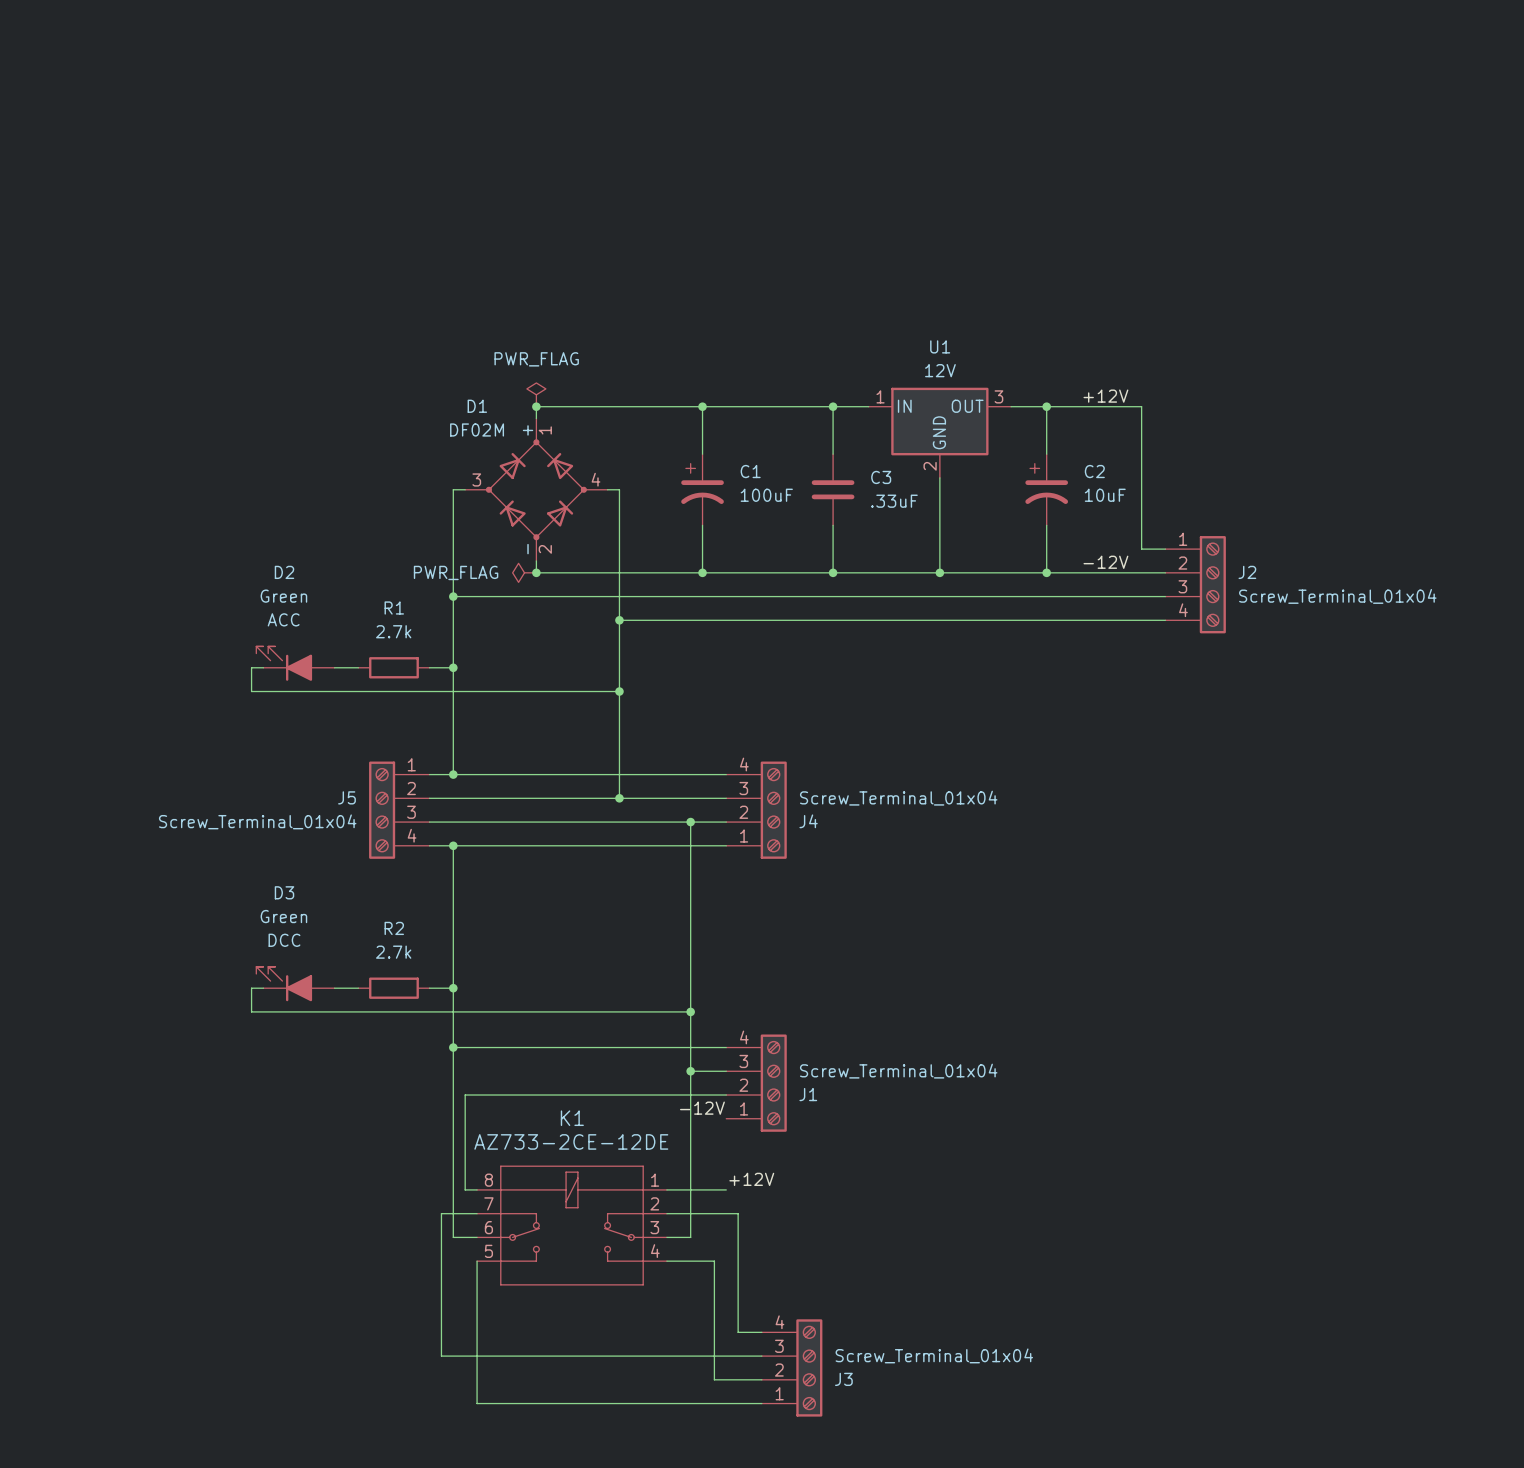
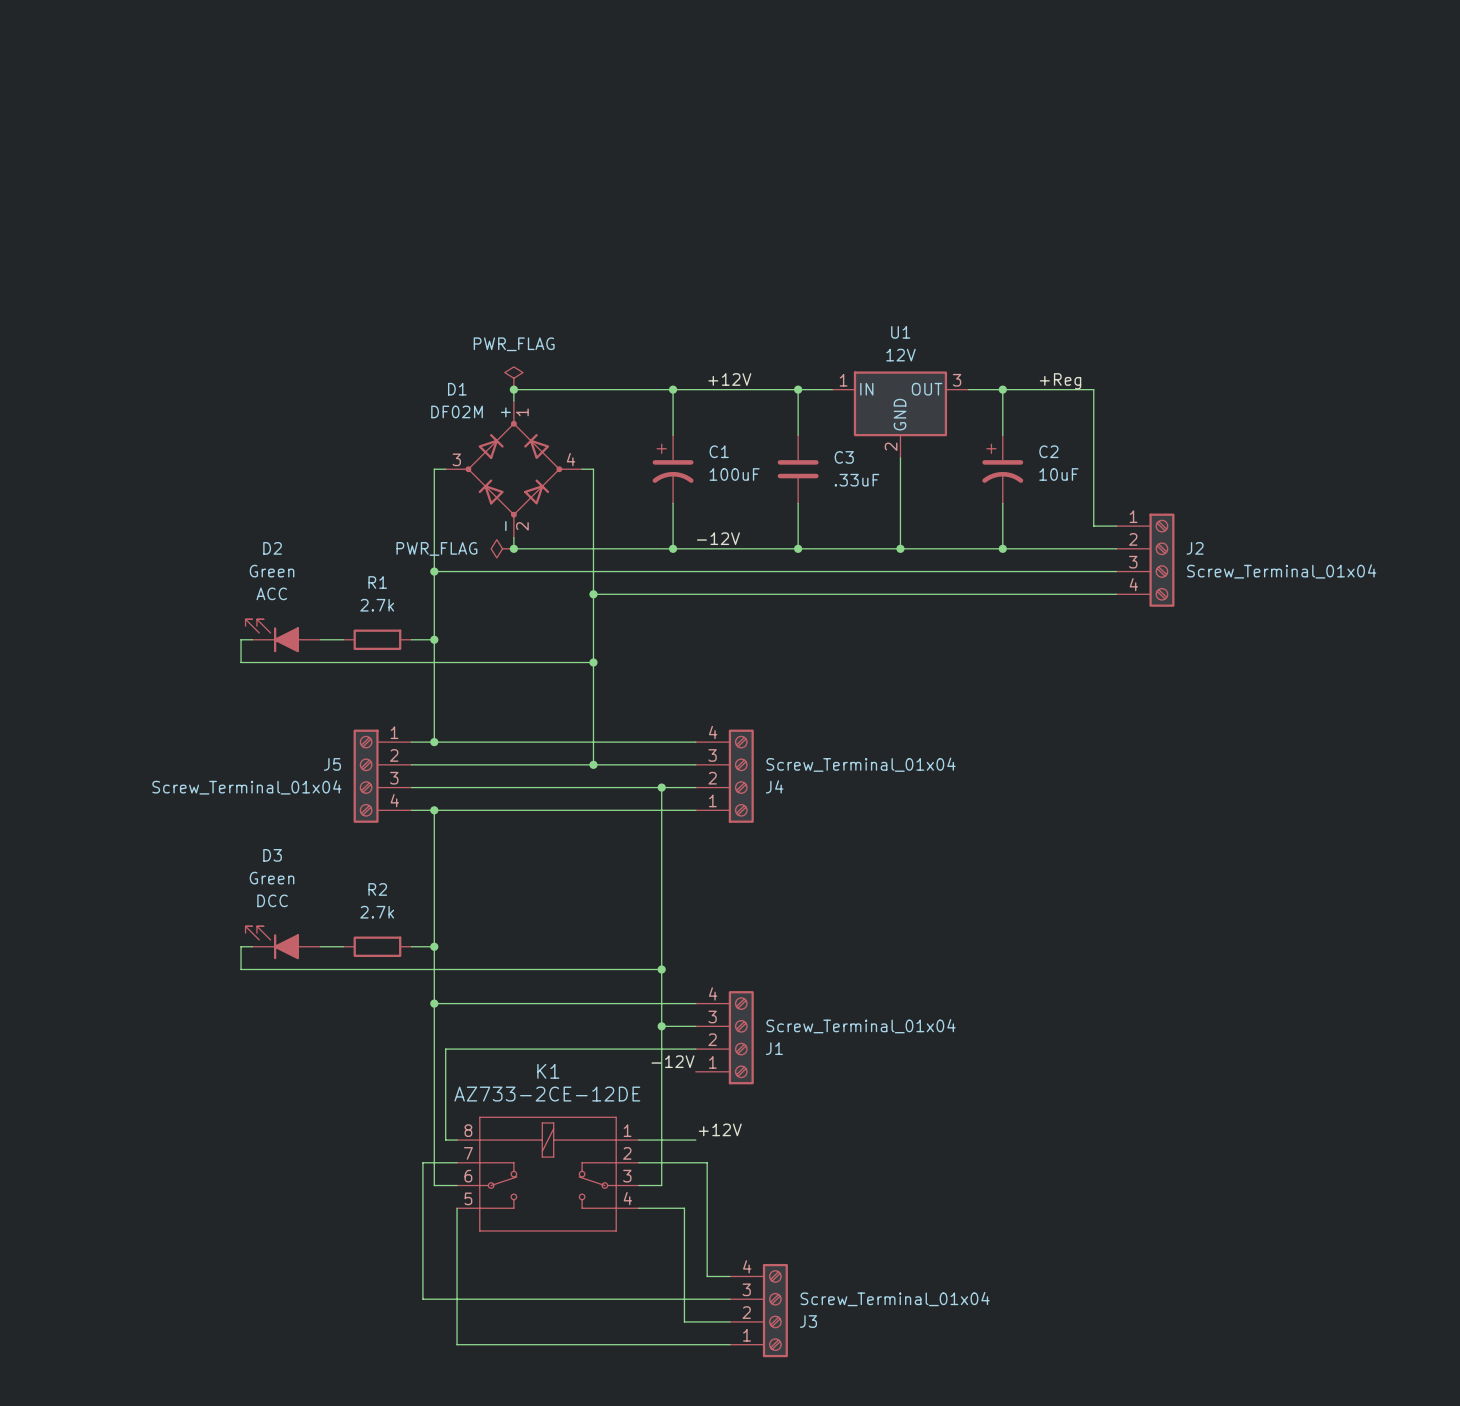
label: none -> +12V (729, 379)
label: +12V (1105, 396) -> none
label: none -> +Reg (1060, 381)
label: none -> -12V (718, 538)
label: -12V (1105, 562) -> none

